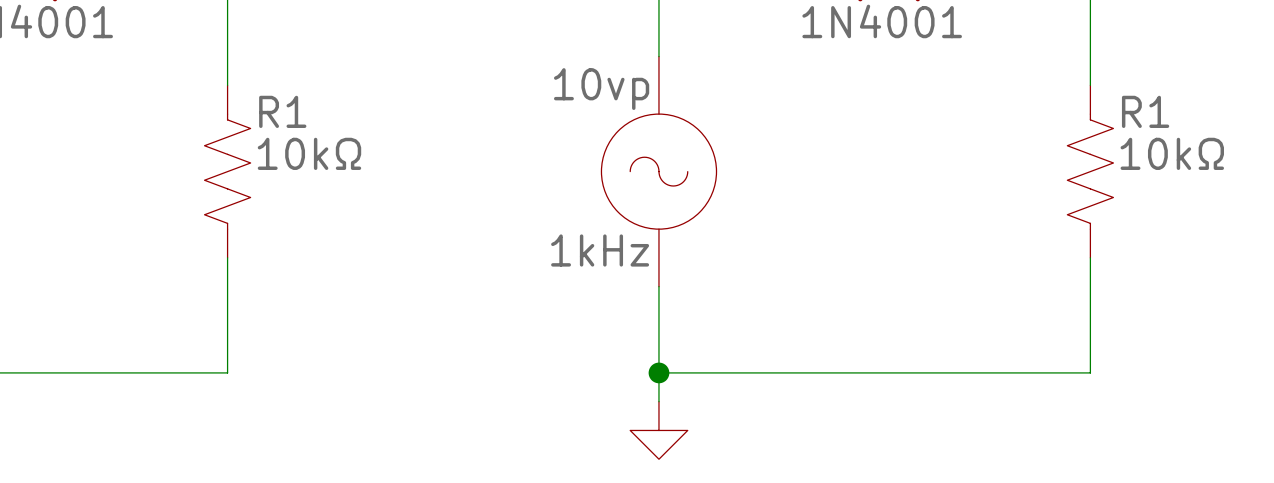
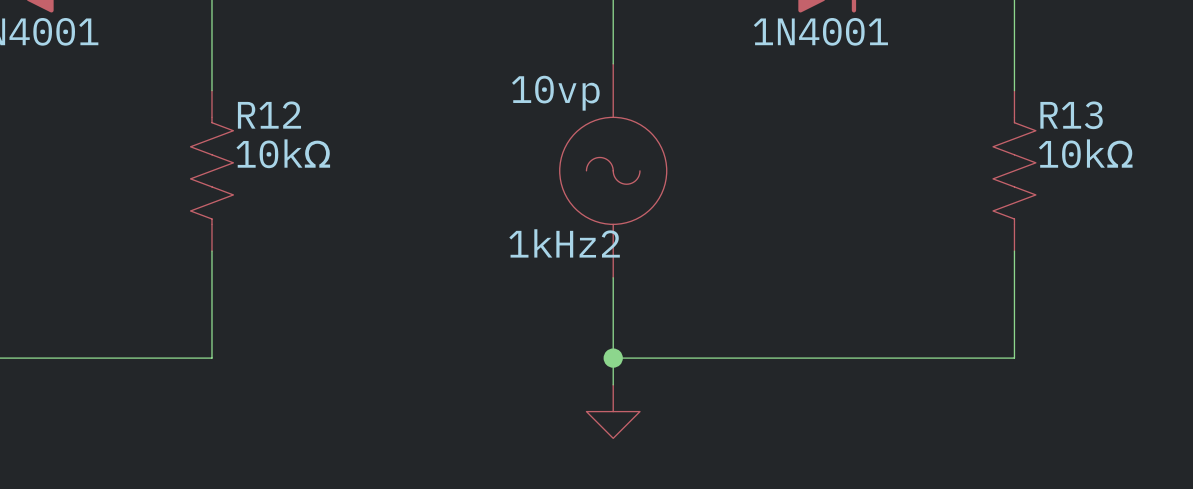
R1 name: R1 (282, 111) -> R12 (269, 115)
R1 name: R1 (1145, 111) -> R13 (1071, 115)
1kHz name: 1kHz (600, 250) -> 1kHz2 (564, 243)

